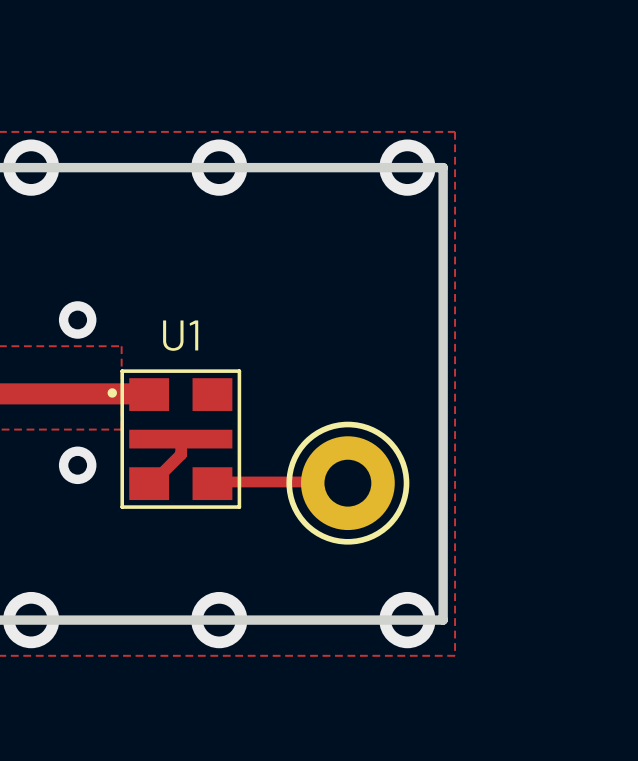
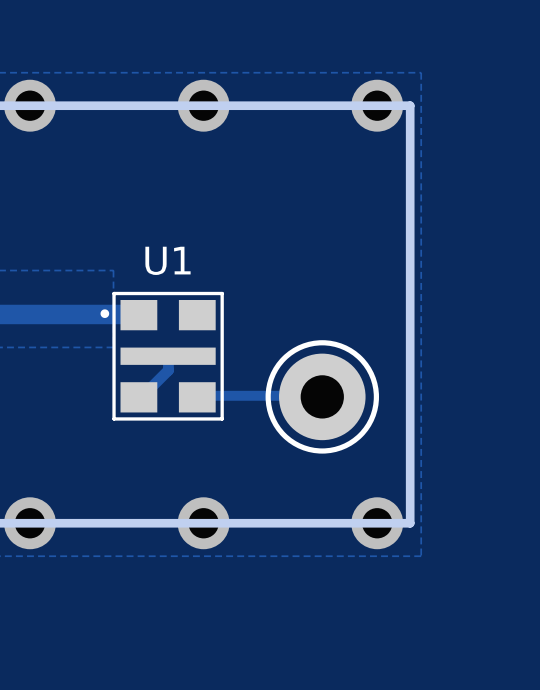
via: (77, 319) -> none
via: (77, 465) -> none

